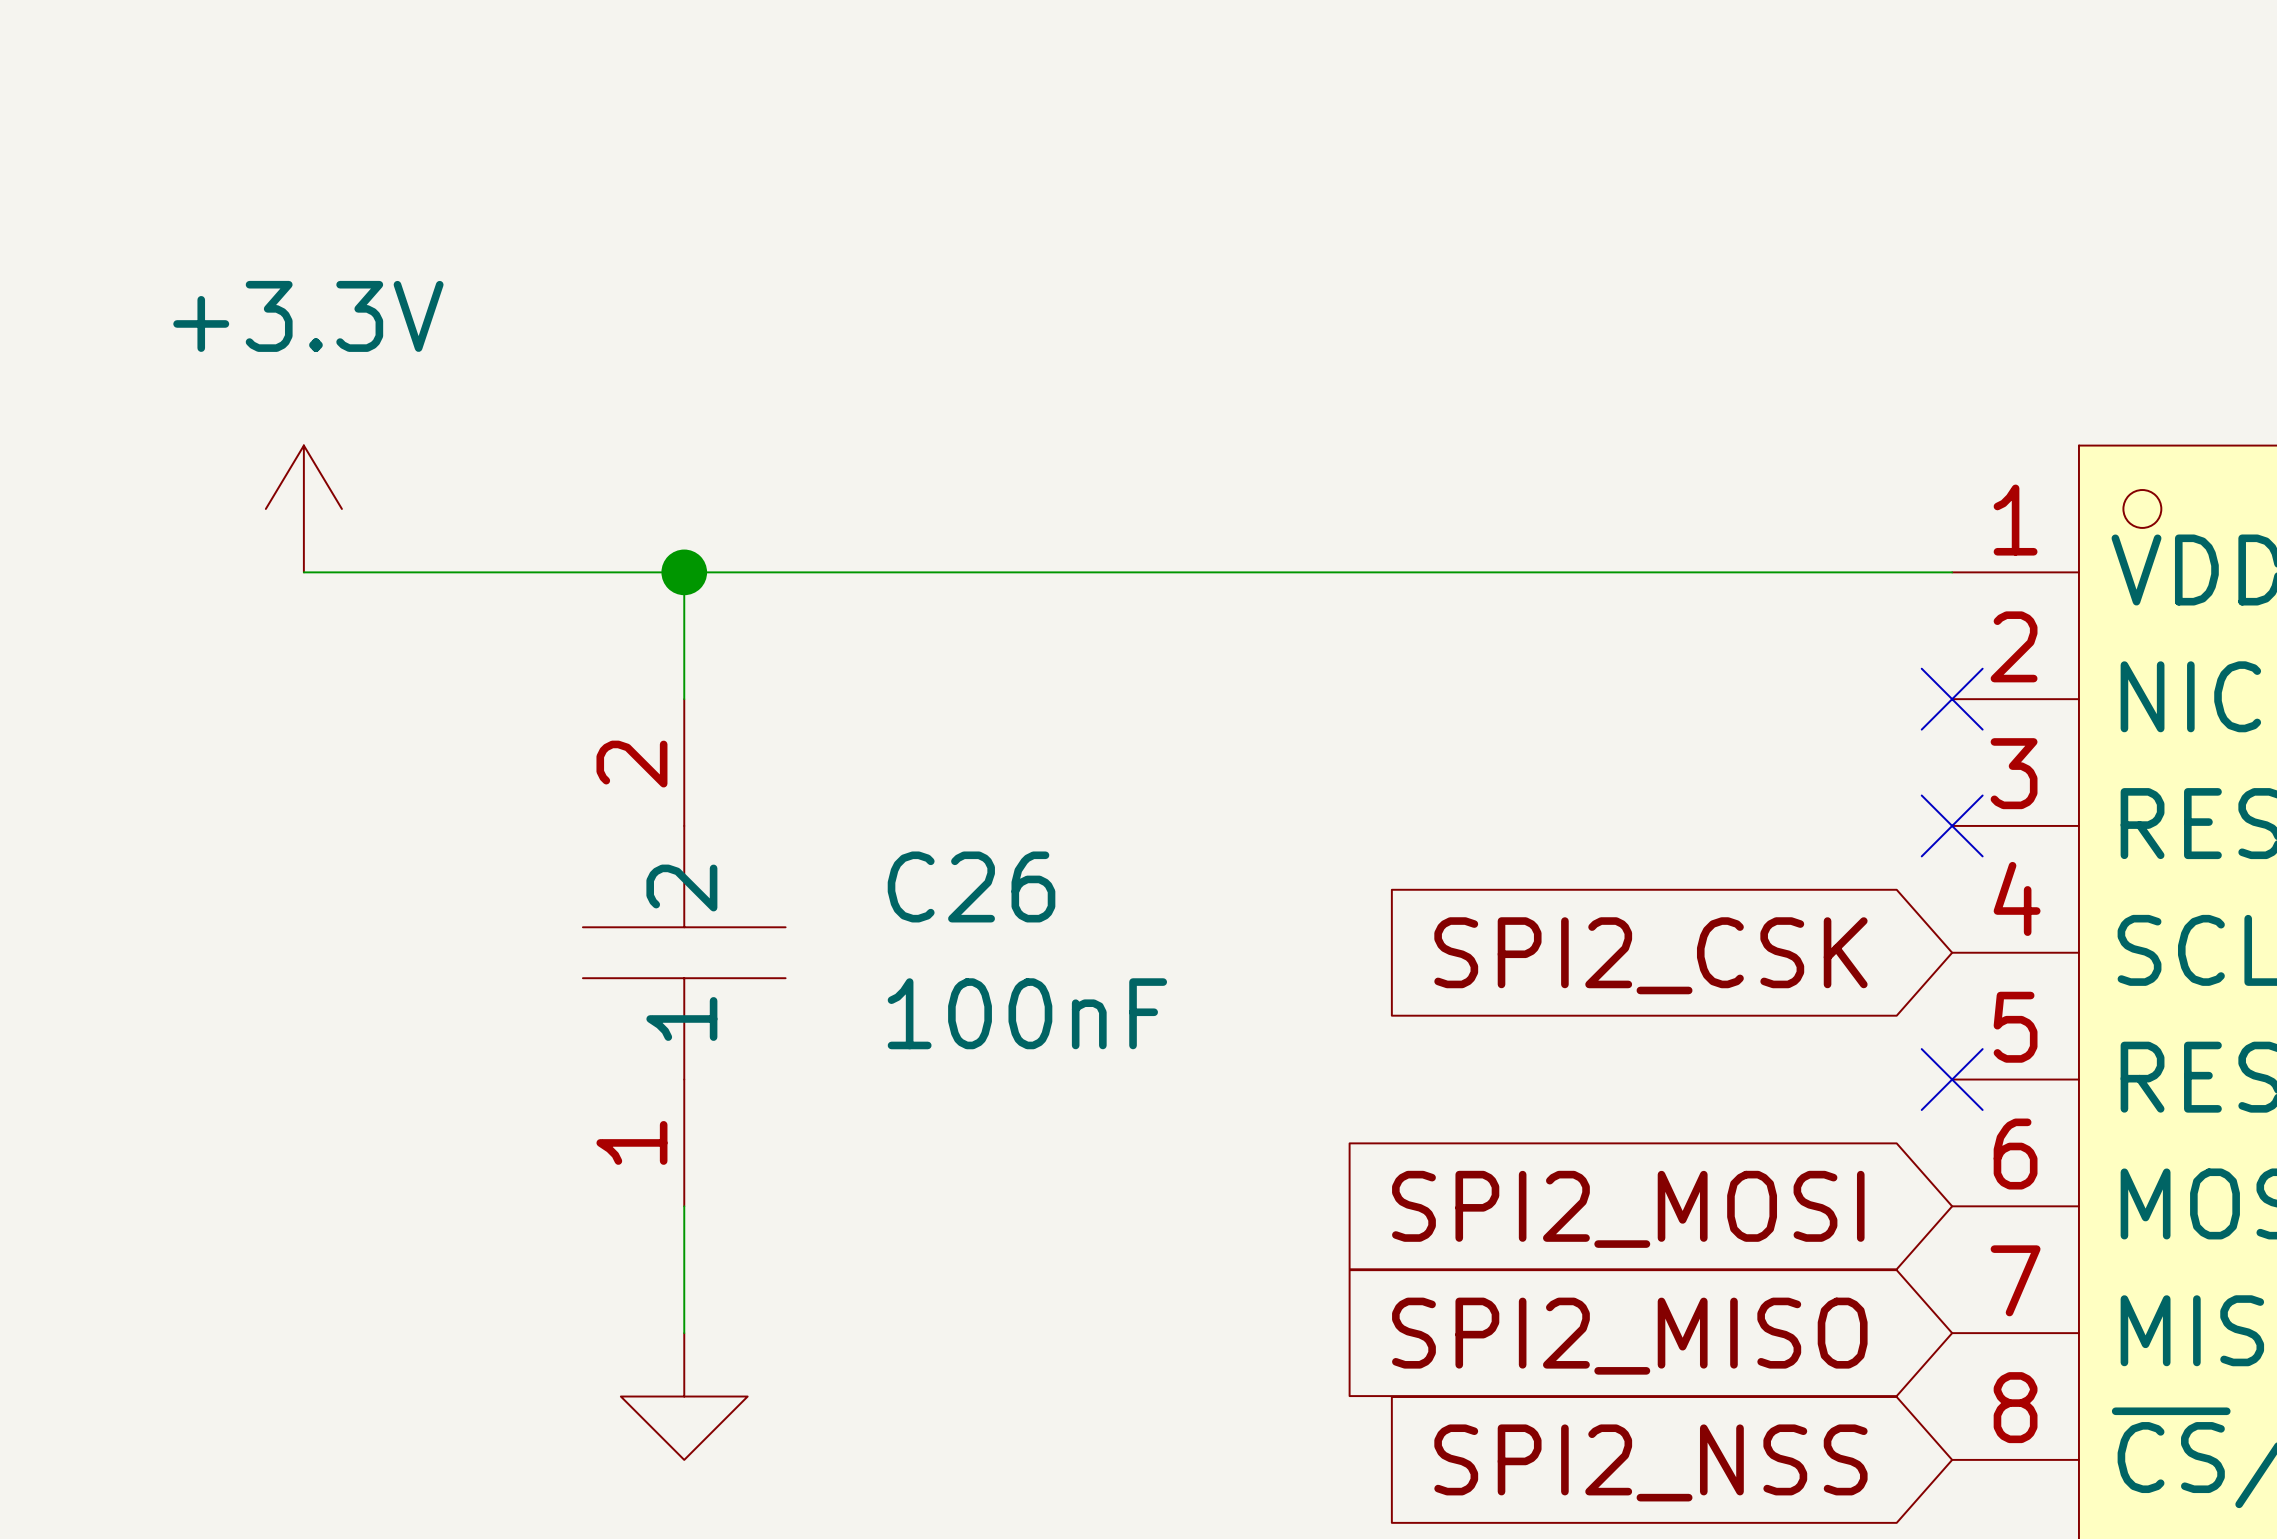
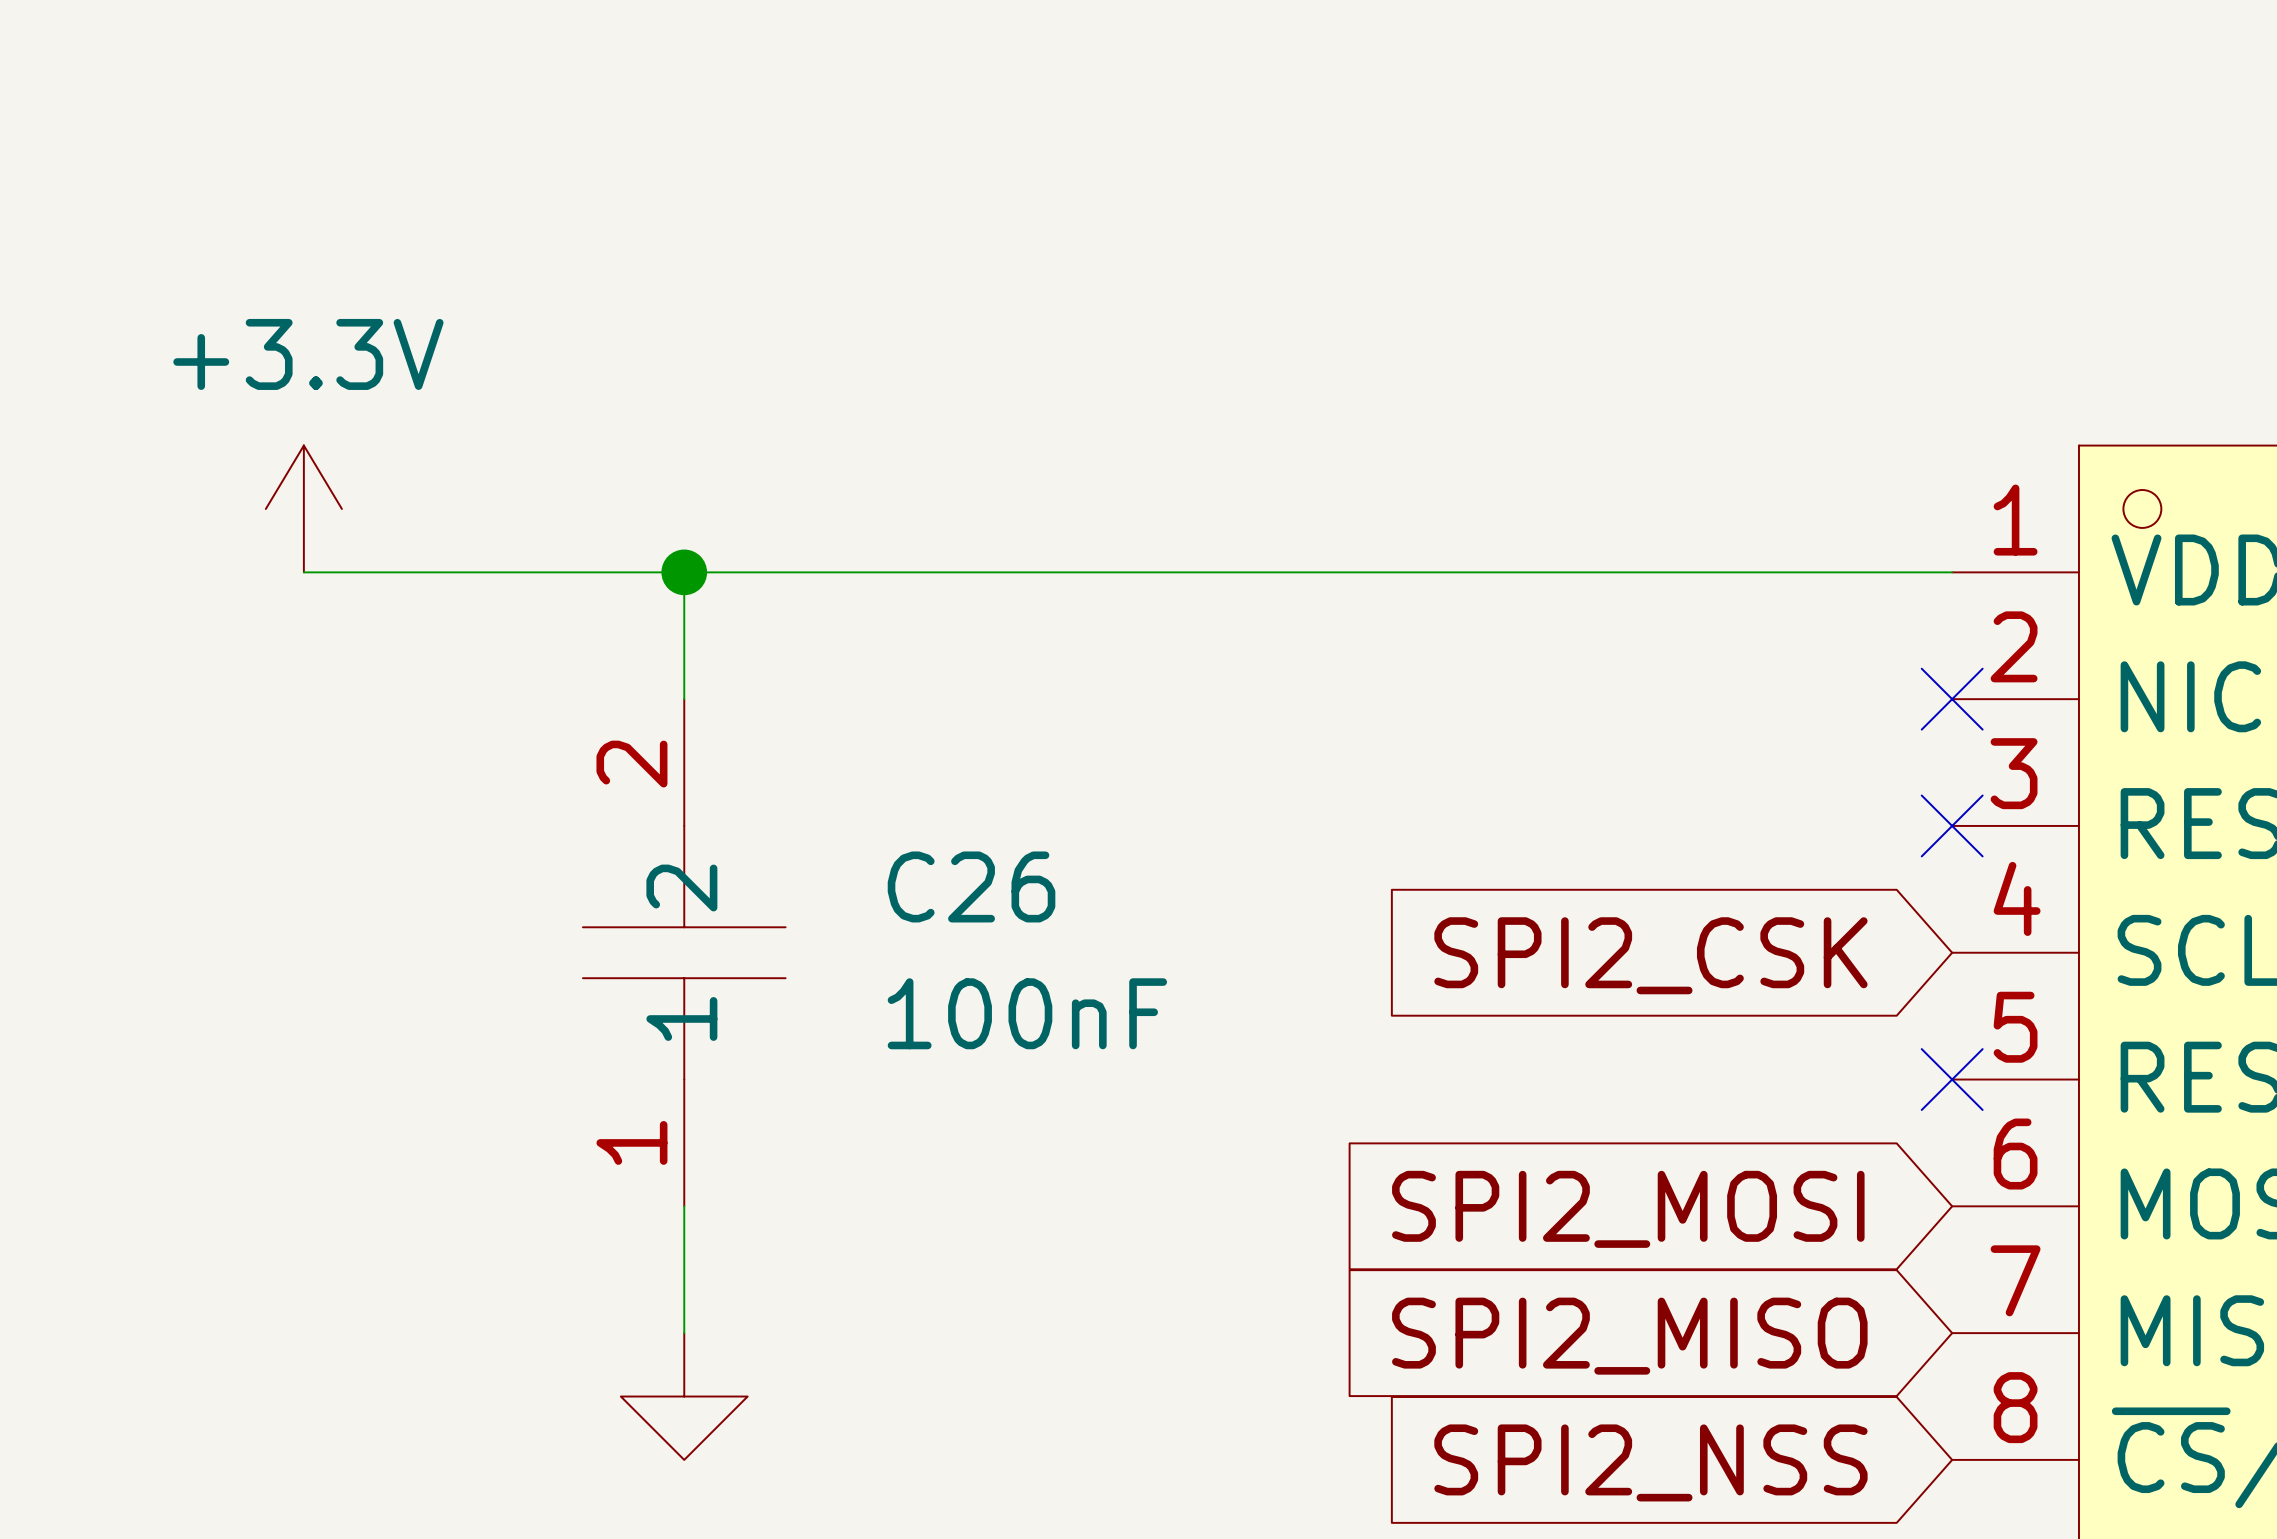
power symbol text position: +3.3V (308, 316) -> +3.3V (308, 354)

